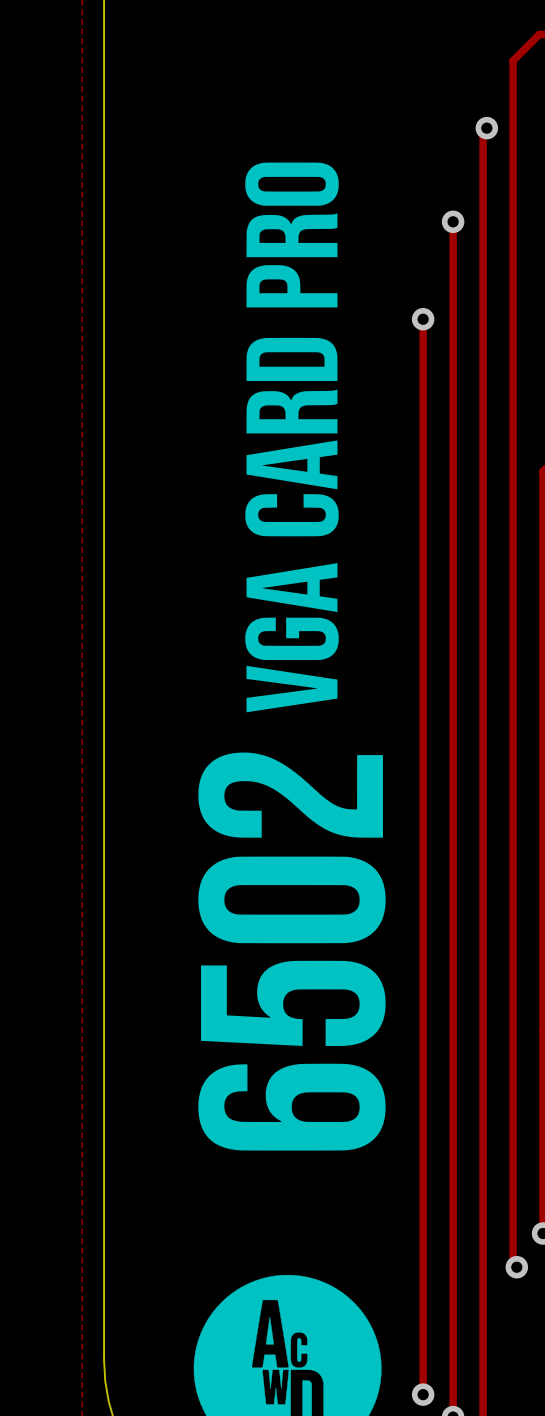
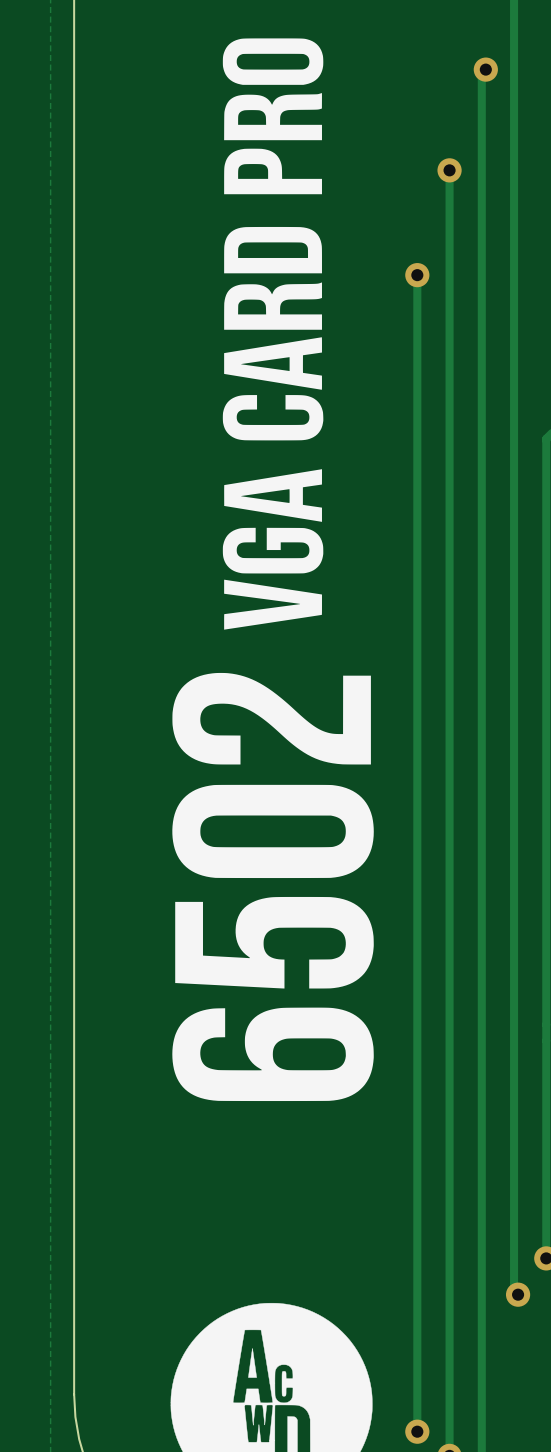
drawing position: (291, 656) -> (273, 569)

